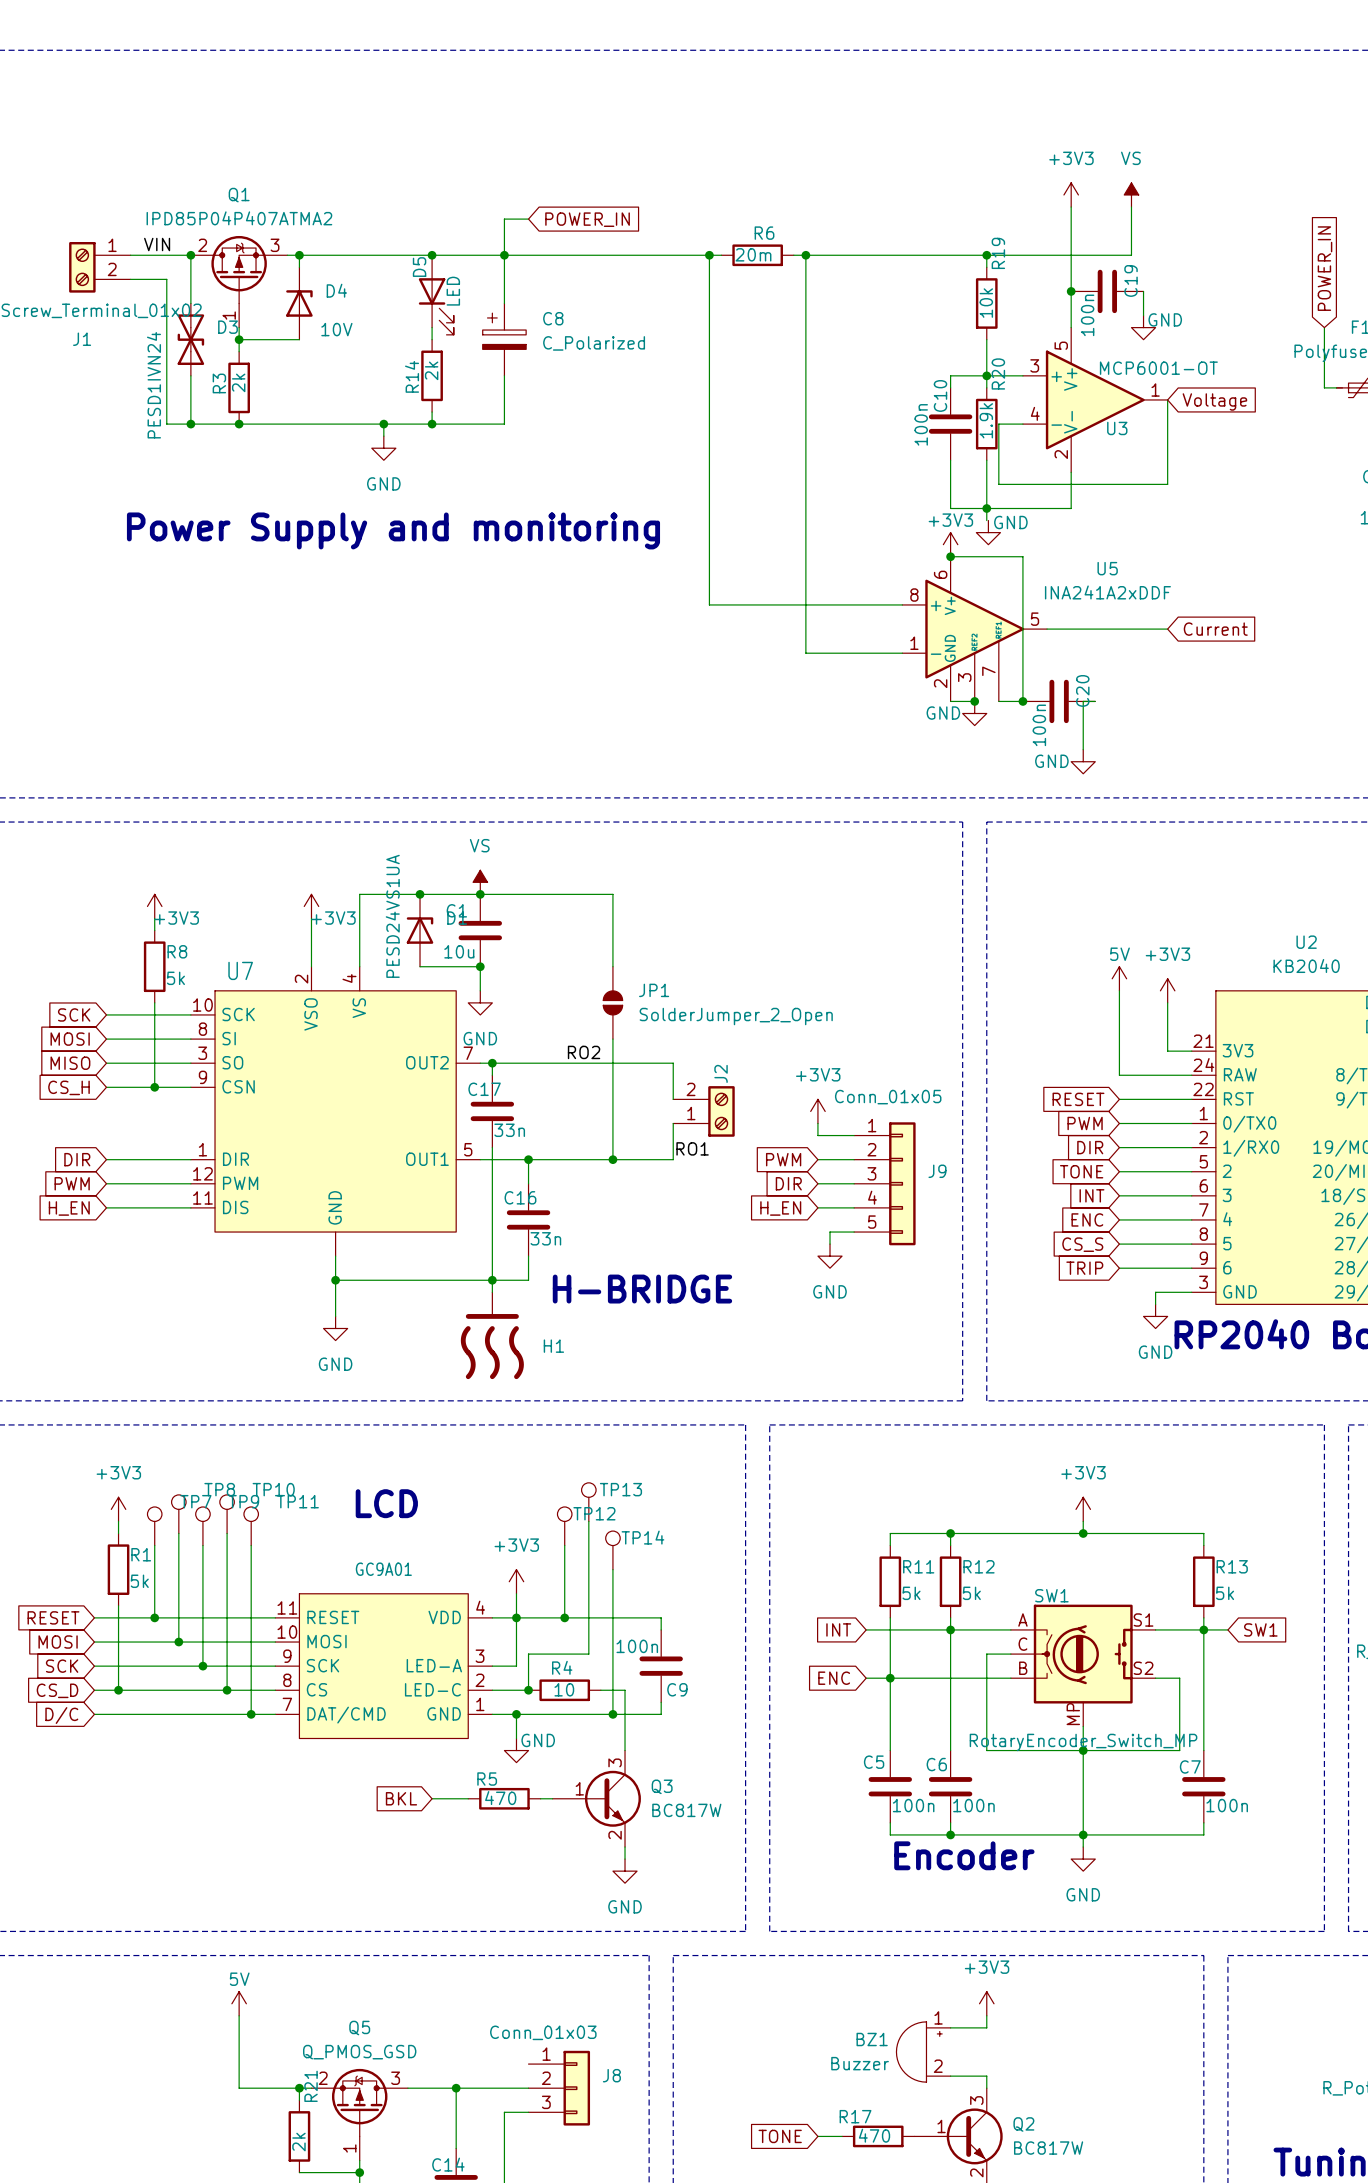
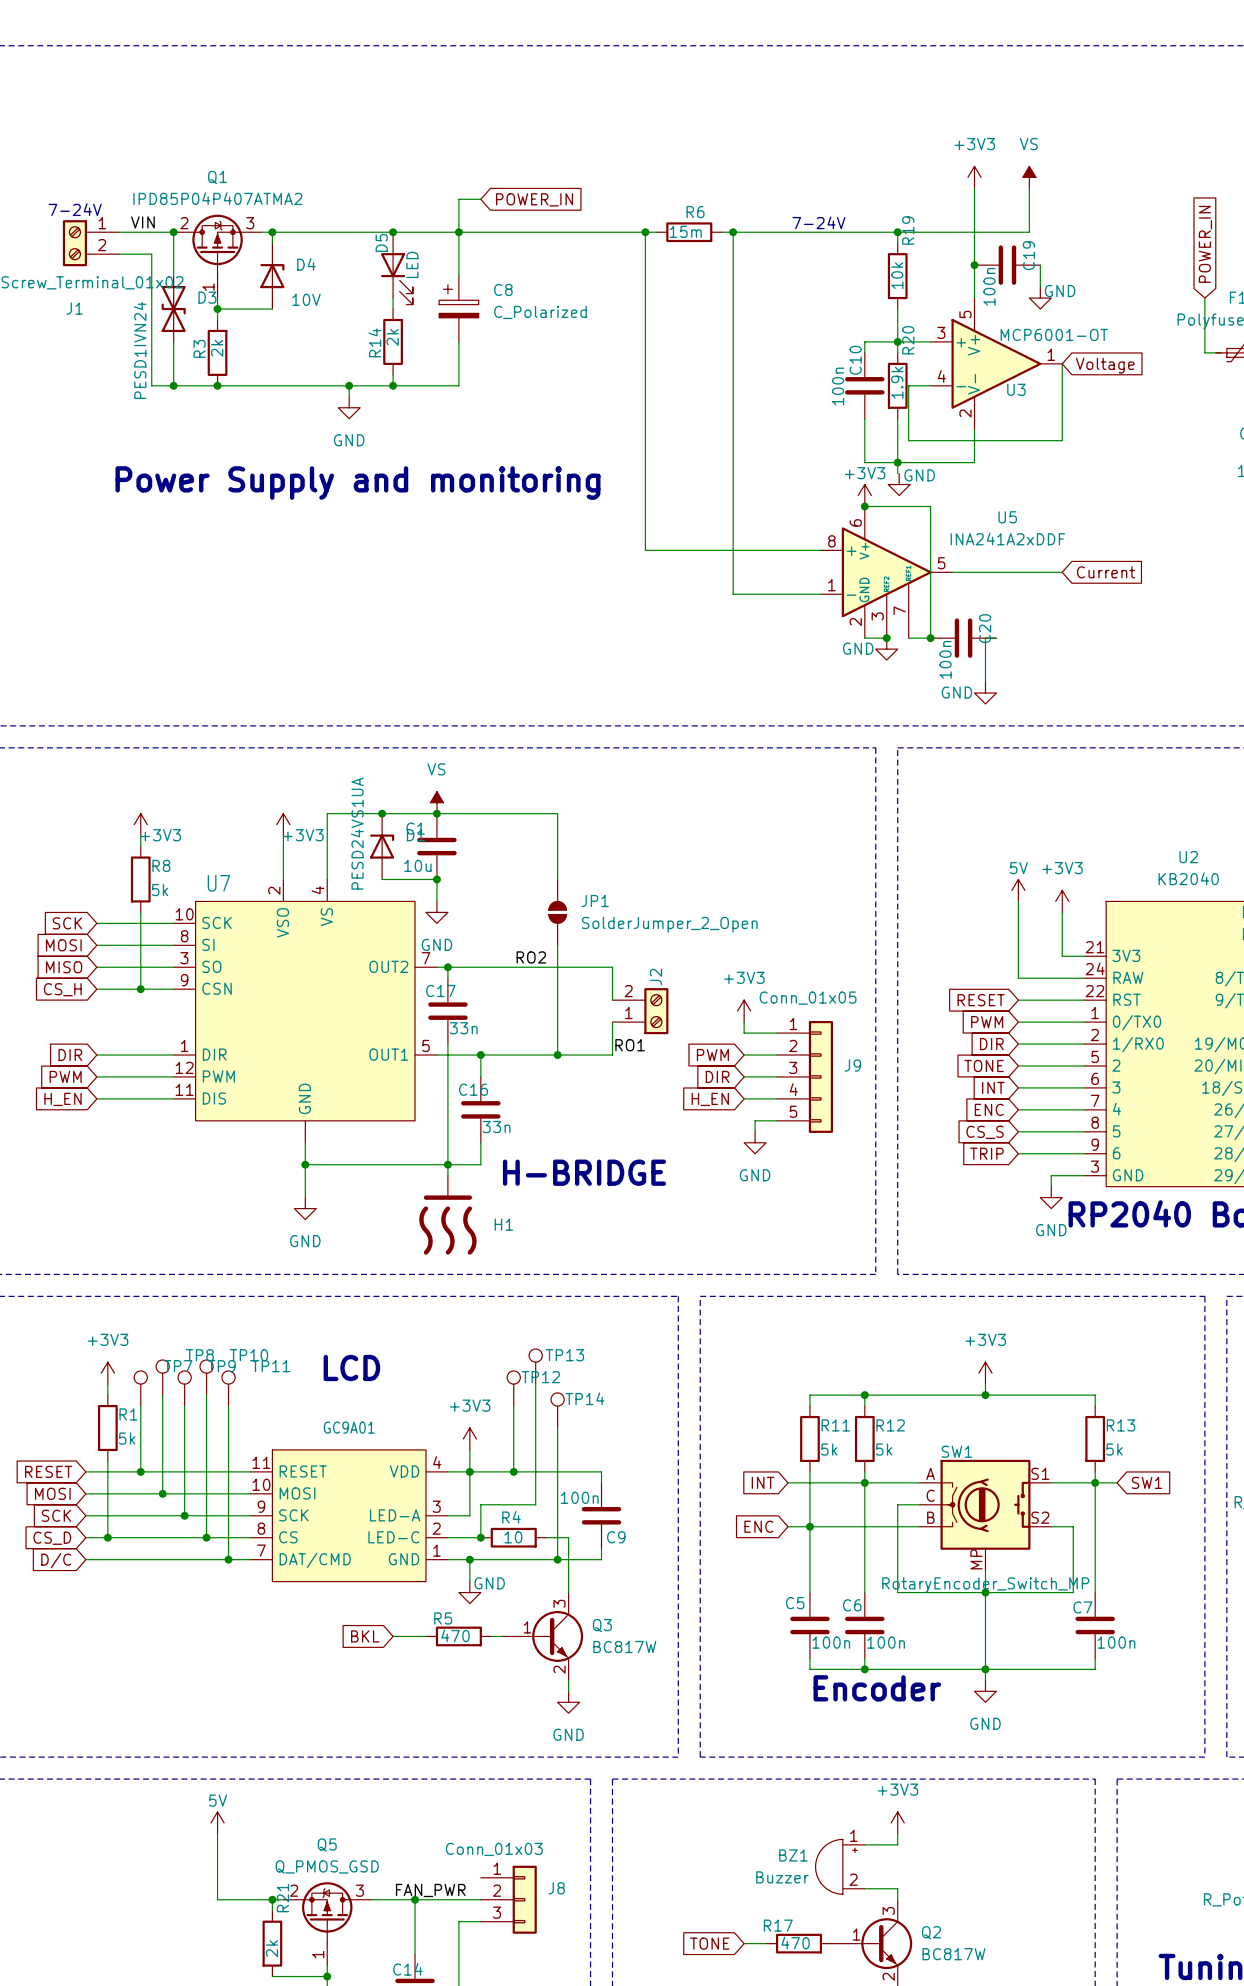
text: none -> 7-24V (75, 209)
text: none -> 7-24V (818, 222)
R6 value: 20m (753, 254) -> 15m (685, 231)
label: none -> FAN_PWR (430, 1890)

